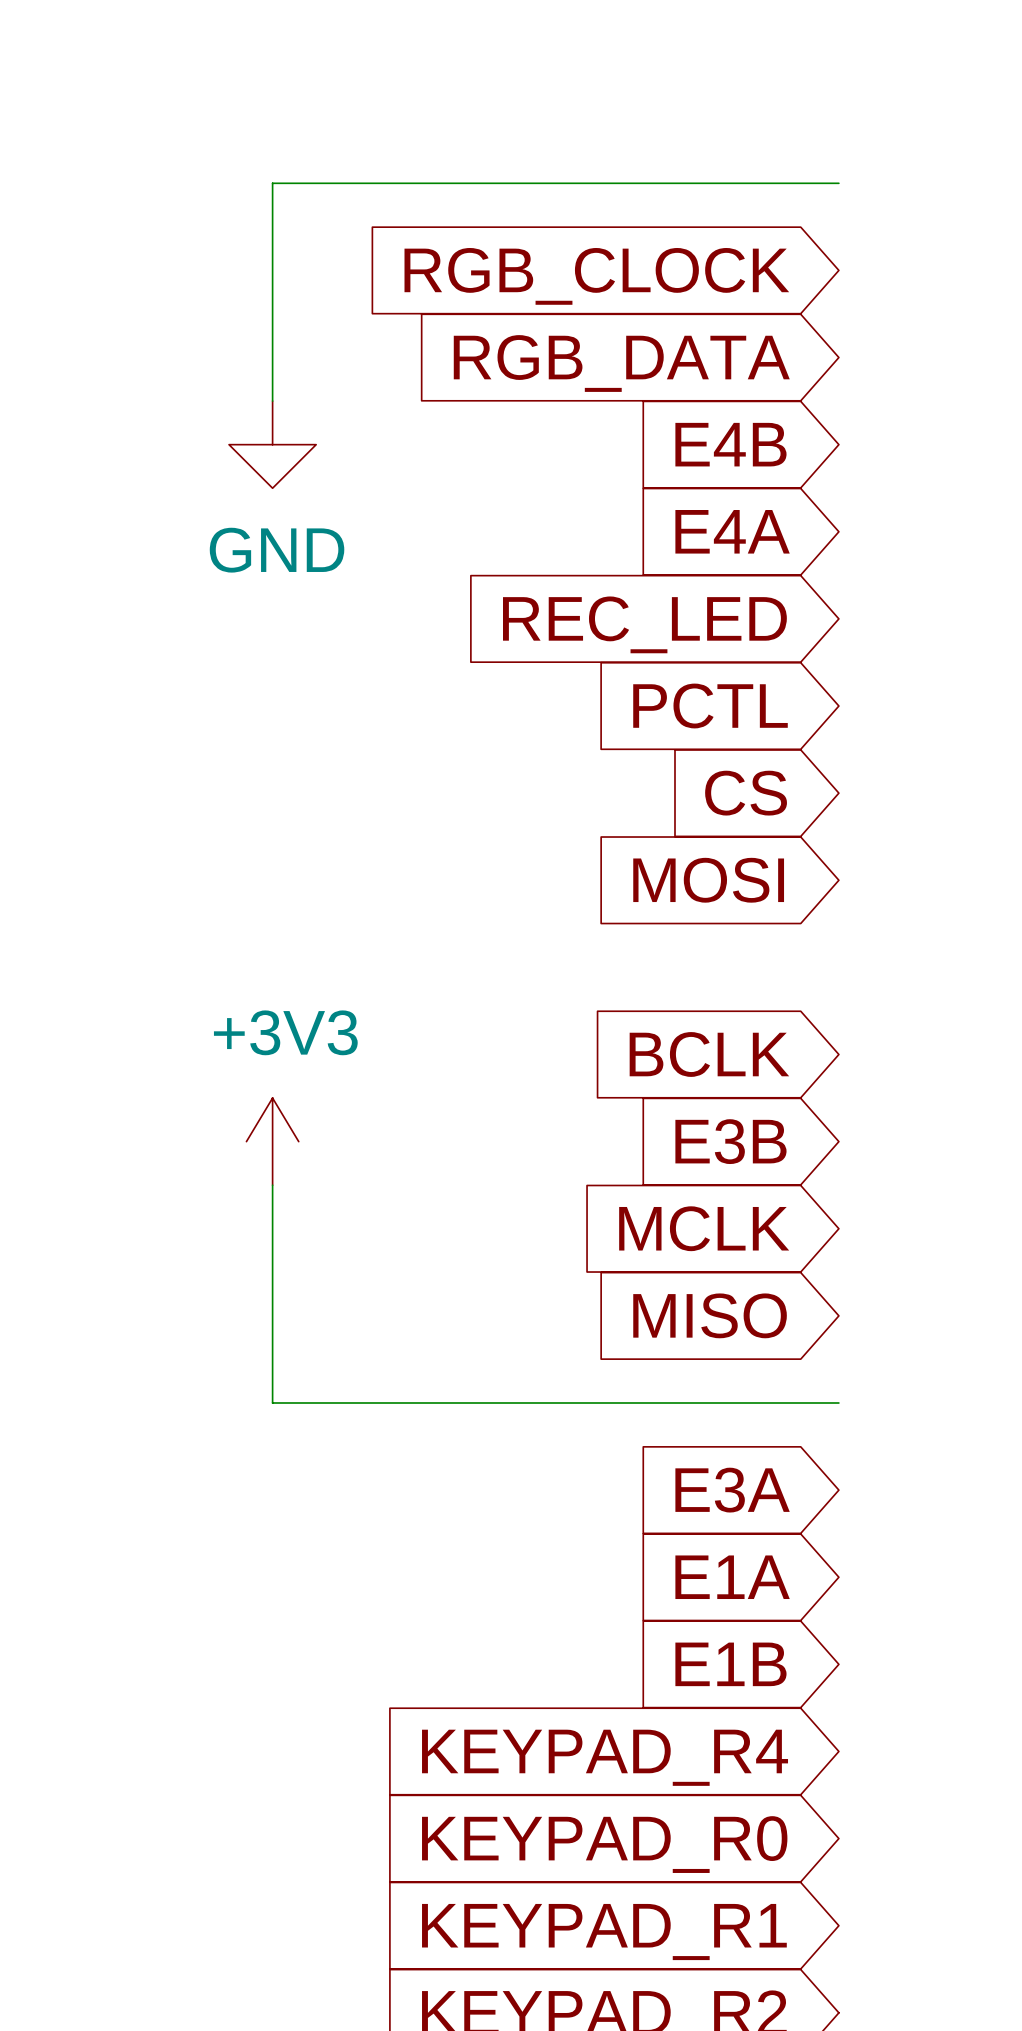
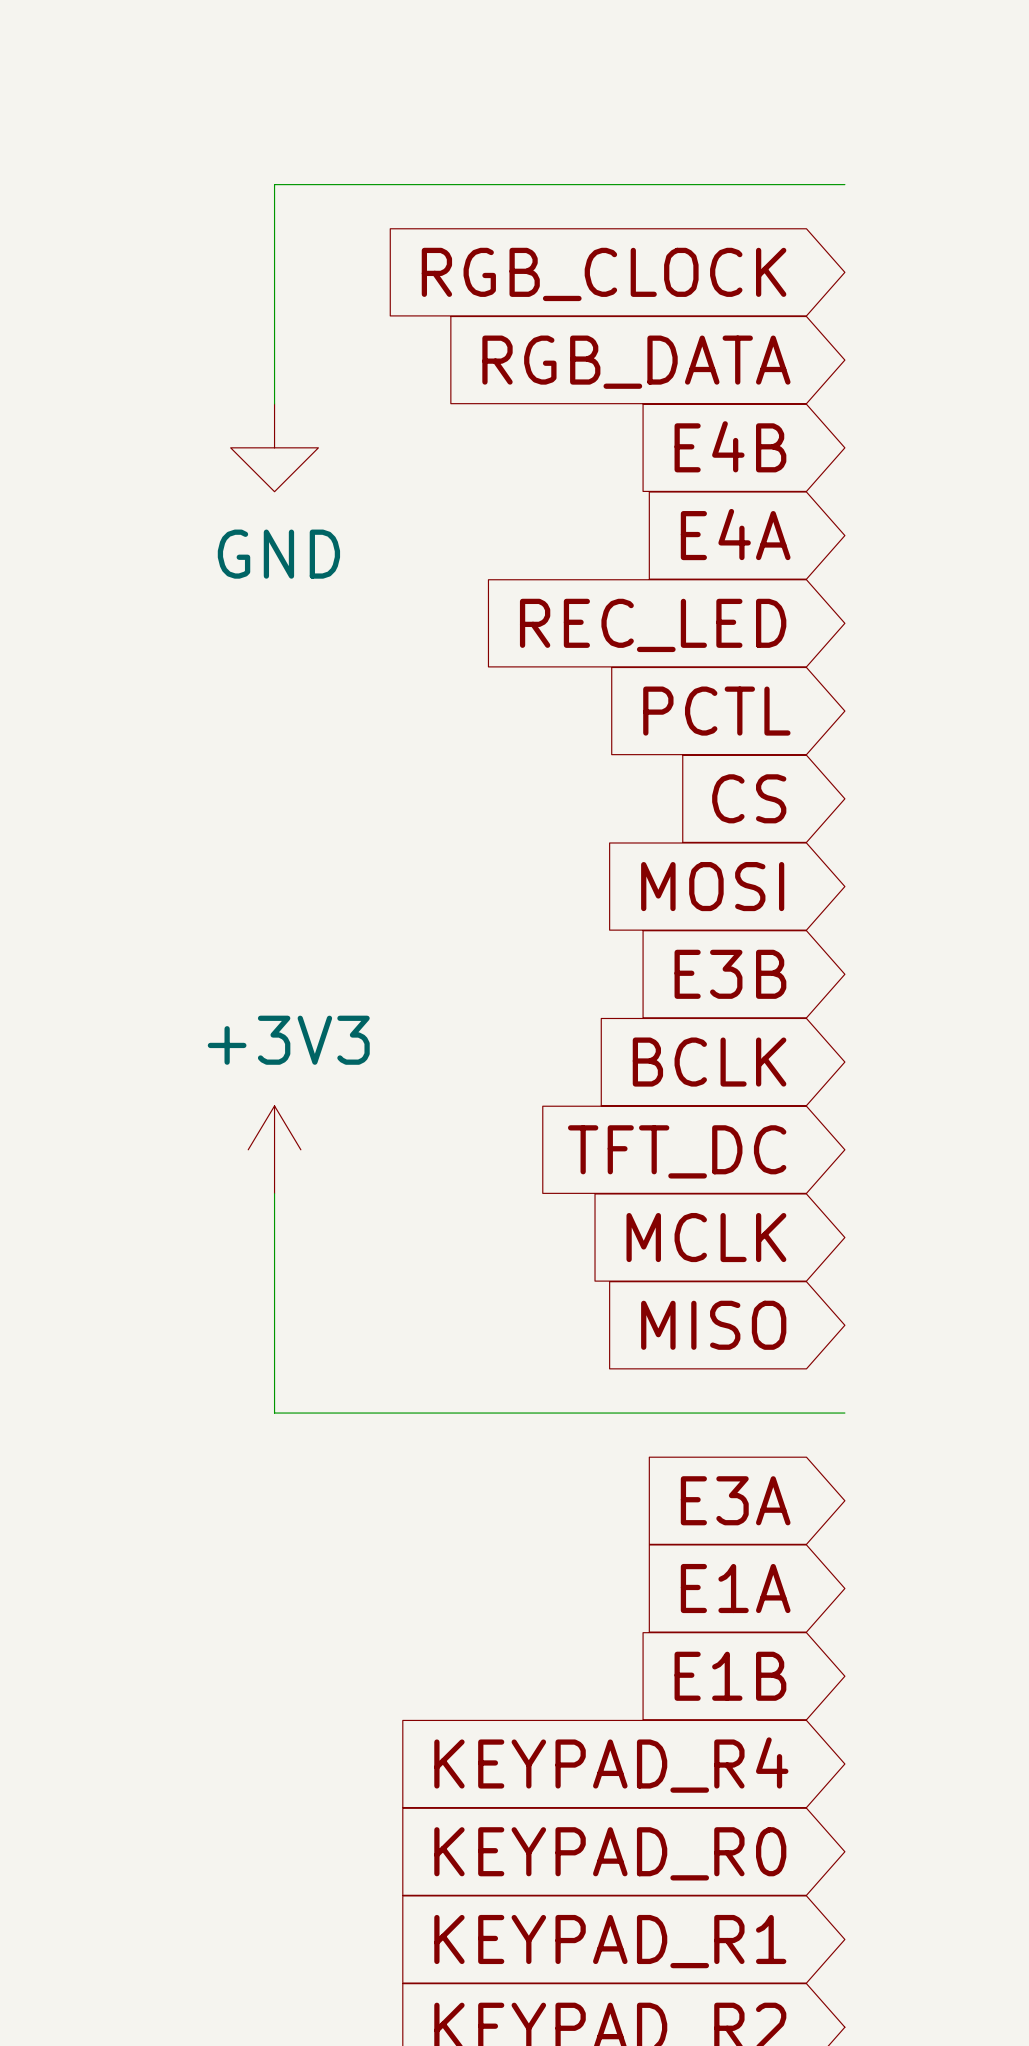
global label: none -> E3B (730, 974)
global label: E3B (730, 1141) -> TFT_DC (677, 1151)

